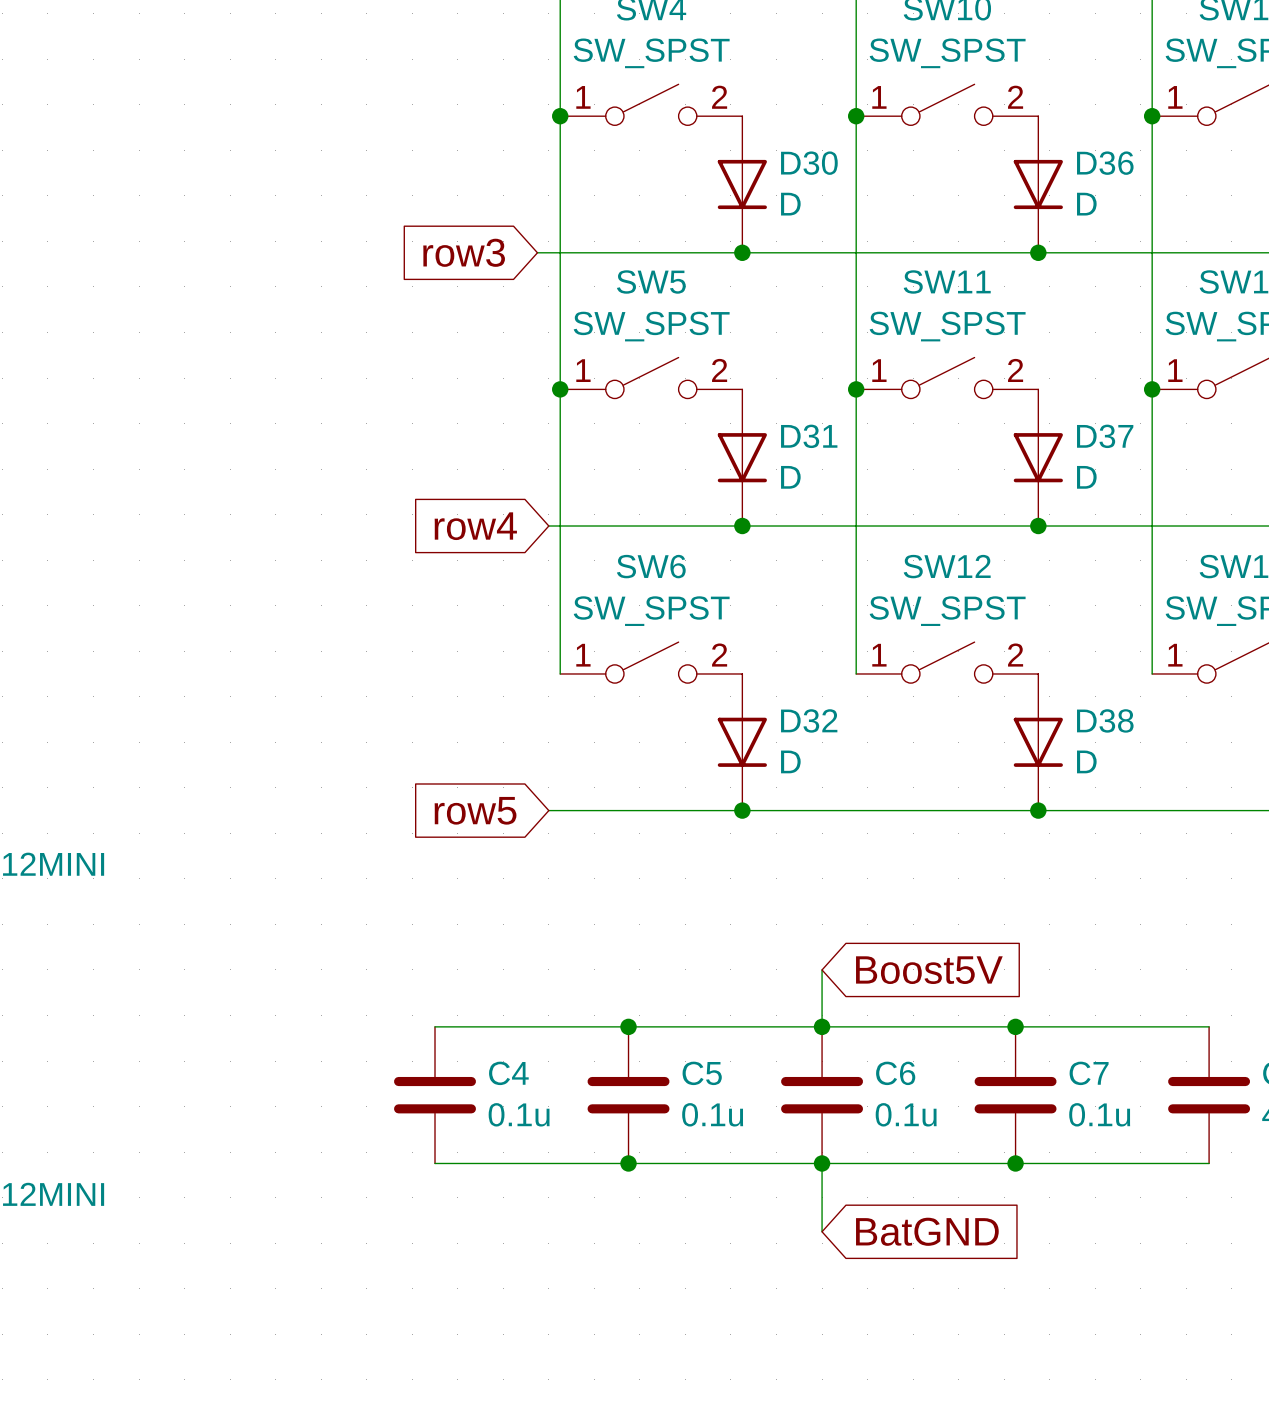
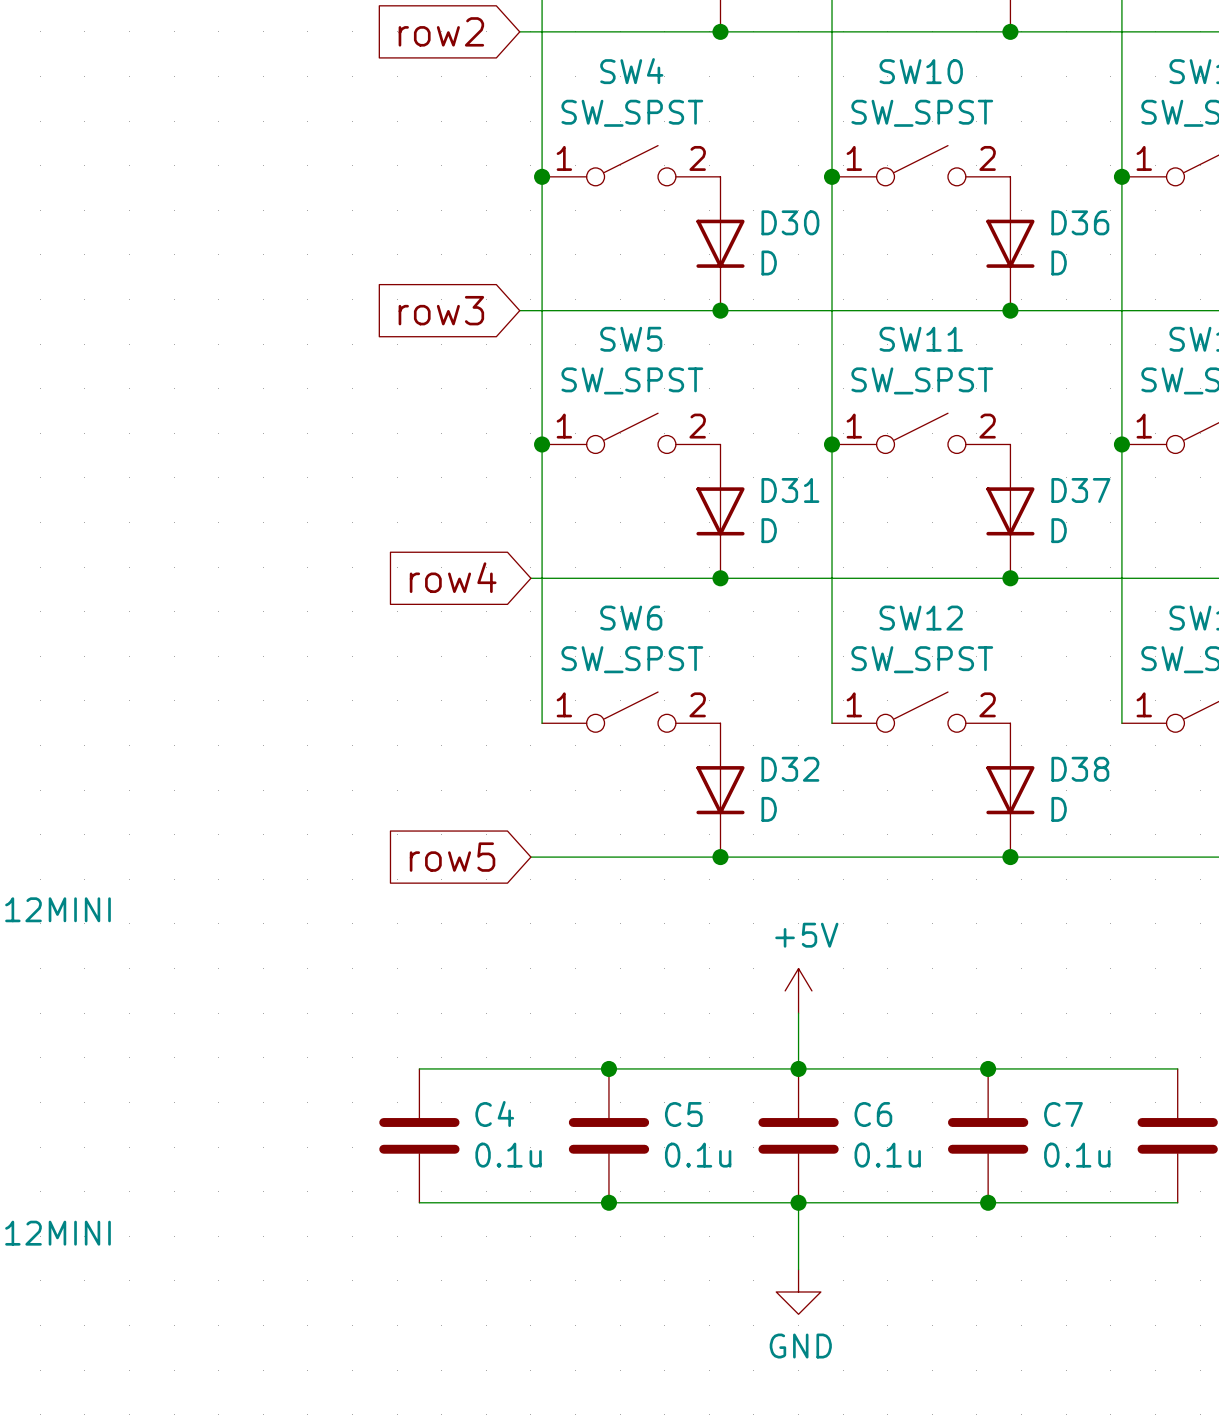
power symbol: none -> +5V (798, 990)
global label: Boost5V (929, 970) -> none
global label: BatGND (927, 1231) -> none
power symbol: none -> GND (798, 1291)

